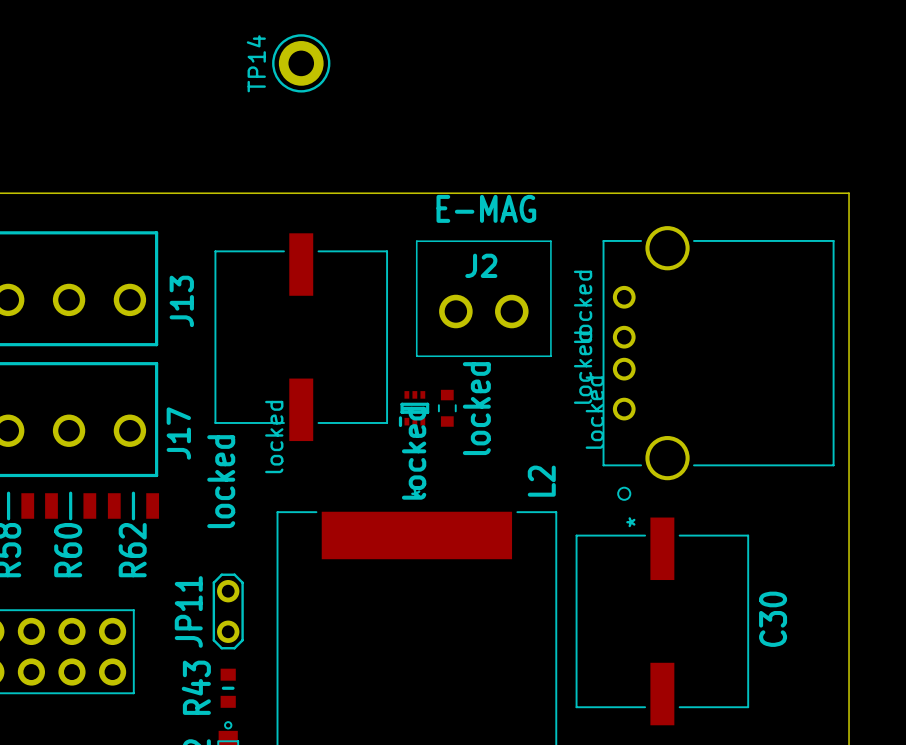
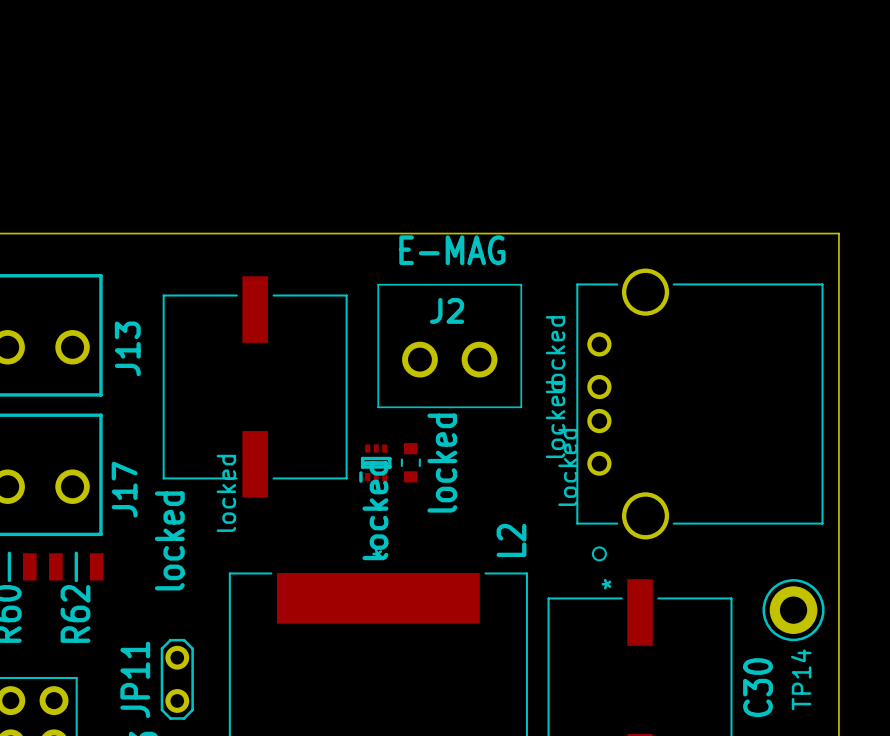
TP14 name position: TP14 (256, 63) -> TP14 (801, 679)
TP14 position: (301, 63) -> (793, 610)

